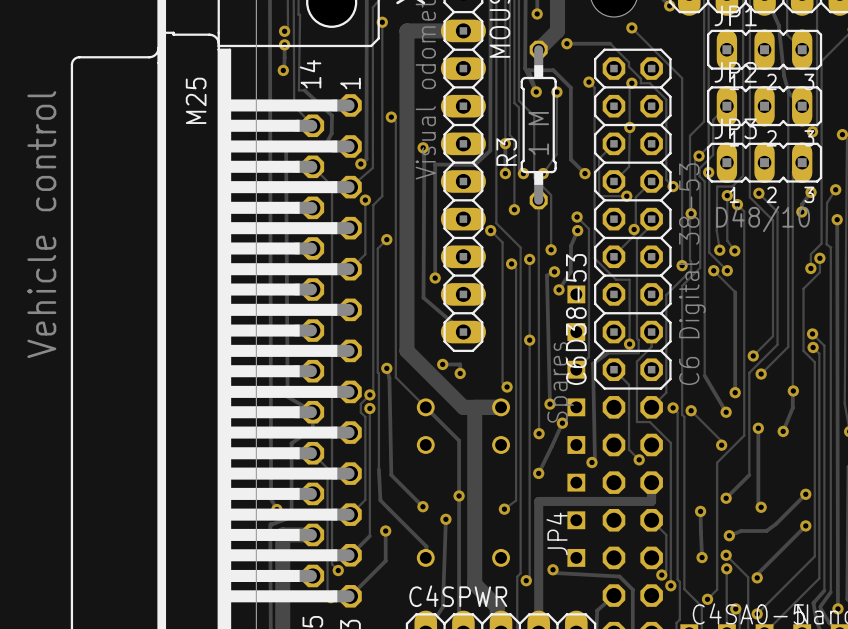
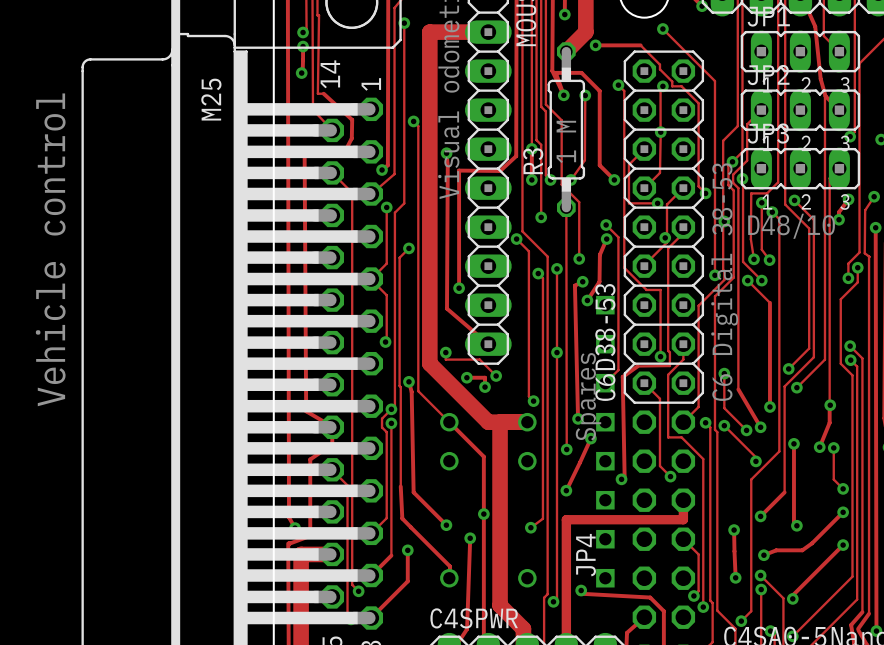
track: none -> (371, 279) (386, 295) (385, 342)
via: none -> (385, 342)
track: none -> (445, 352) (445, 359) (479, 359) (496, 375)
via: none -> (445, 352)
track: none -> (724, 373) (724, 408) (746, 430)
via: none -> (724, 373)
via: none -> (496, 375)
via: none -> (746, 430)
track: none -> (833, 447) (833, 479) (843, 488)
via: none -> (833, 447)
via: none -> (843, 488)

